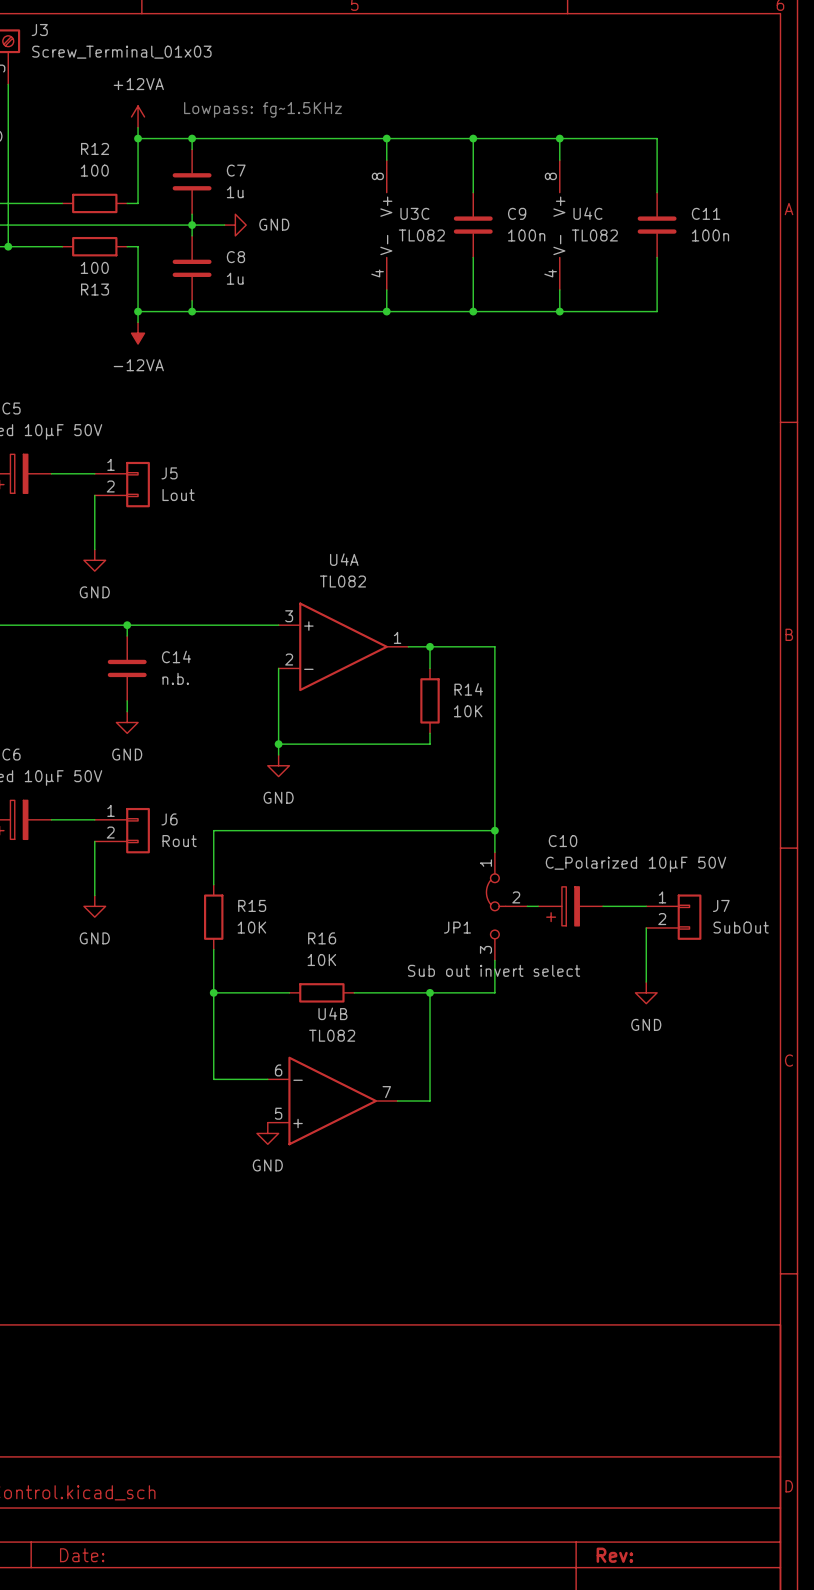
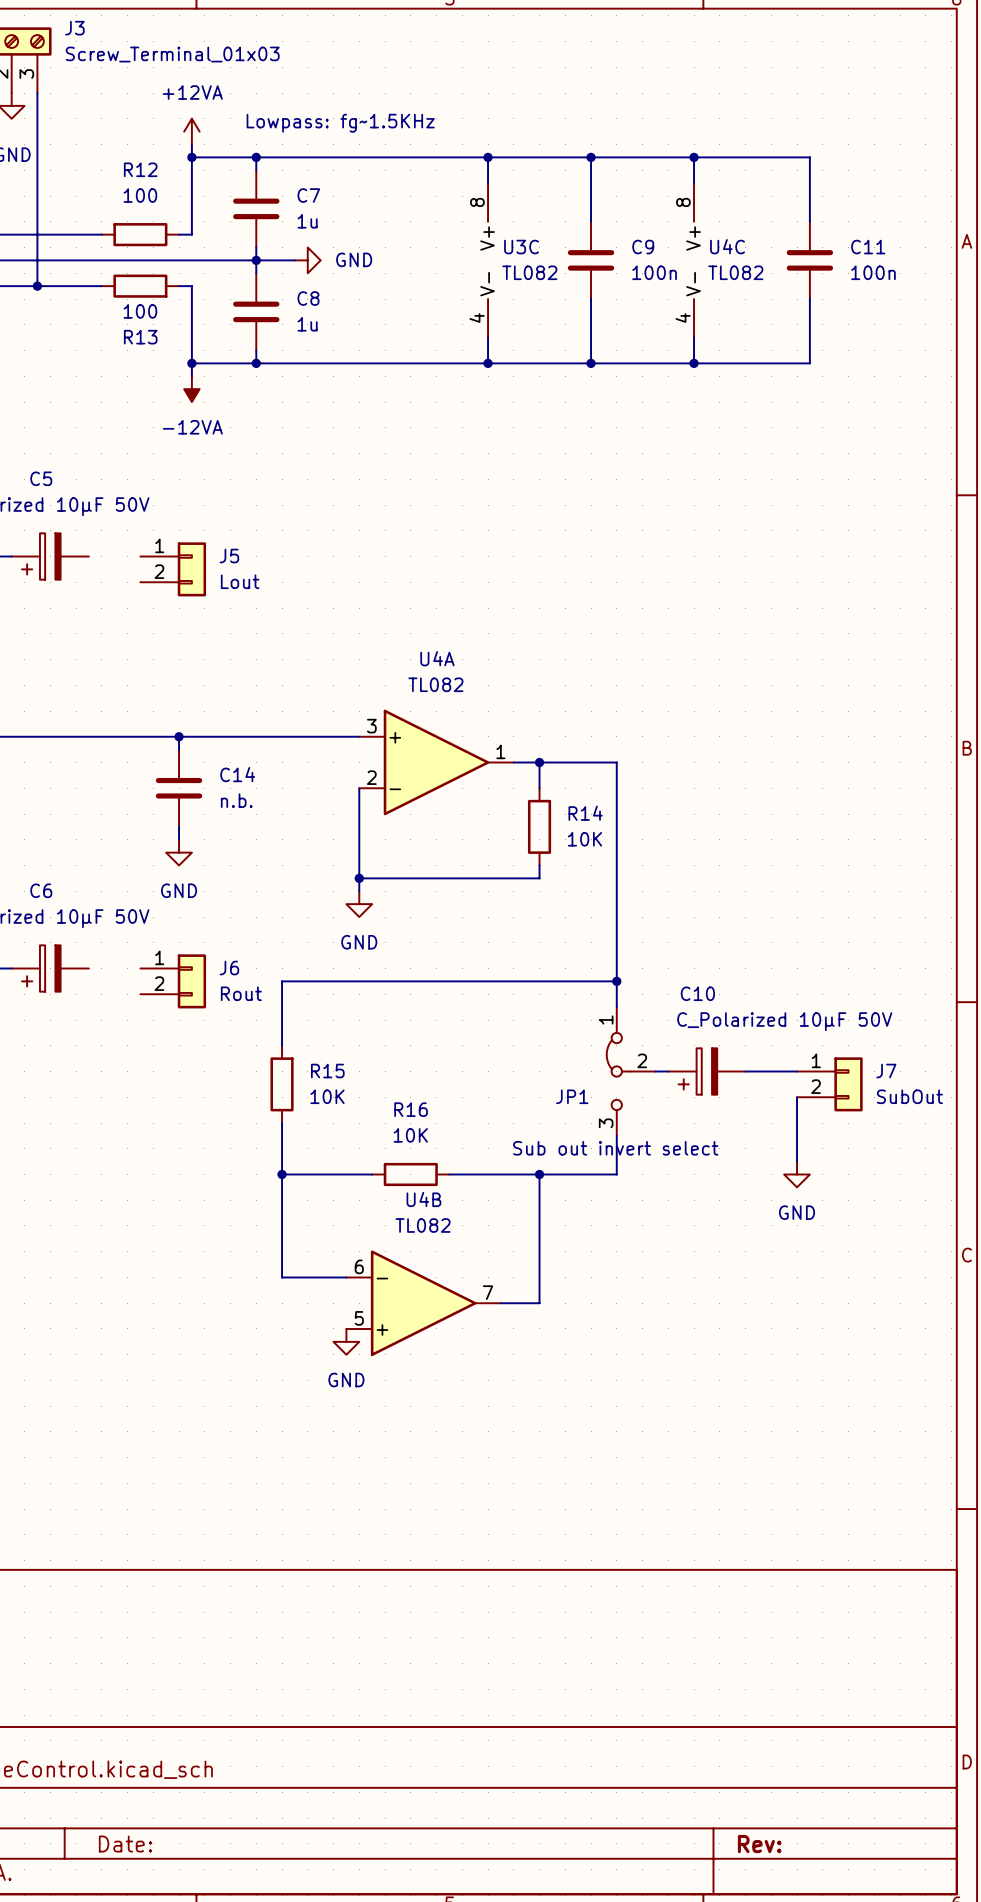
wire: (51, 473) (94, 473) -> none
wire: (94, 495) (94, 549) -> none
power symbol: GND (94, 560) -> none
wire: (51, 819) (94, 819) -> none
wire: (94, 841) (94, 895) -> none
power symbol: GND (94, 906) -> none

